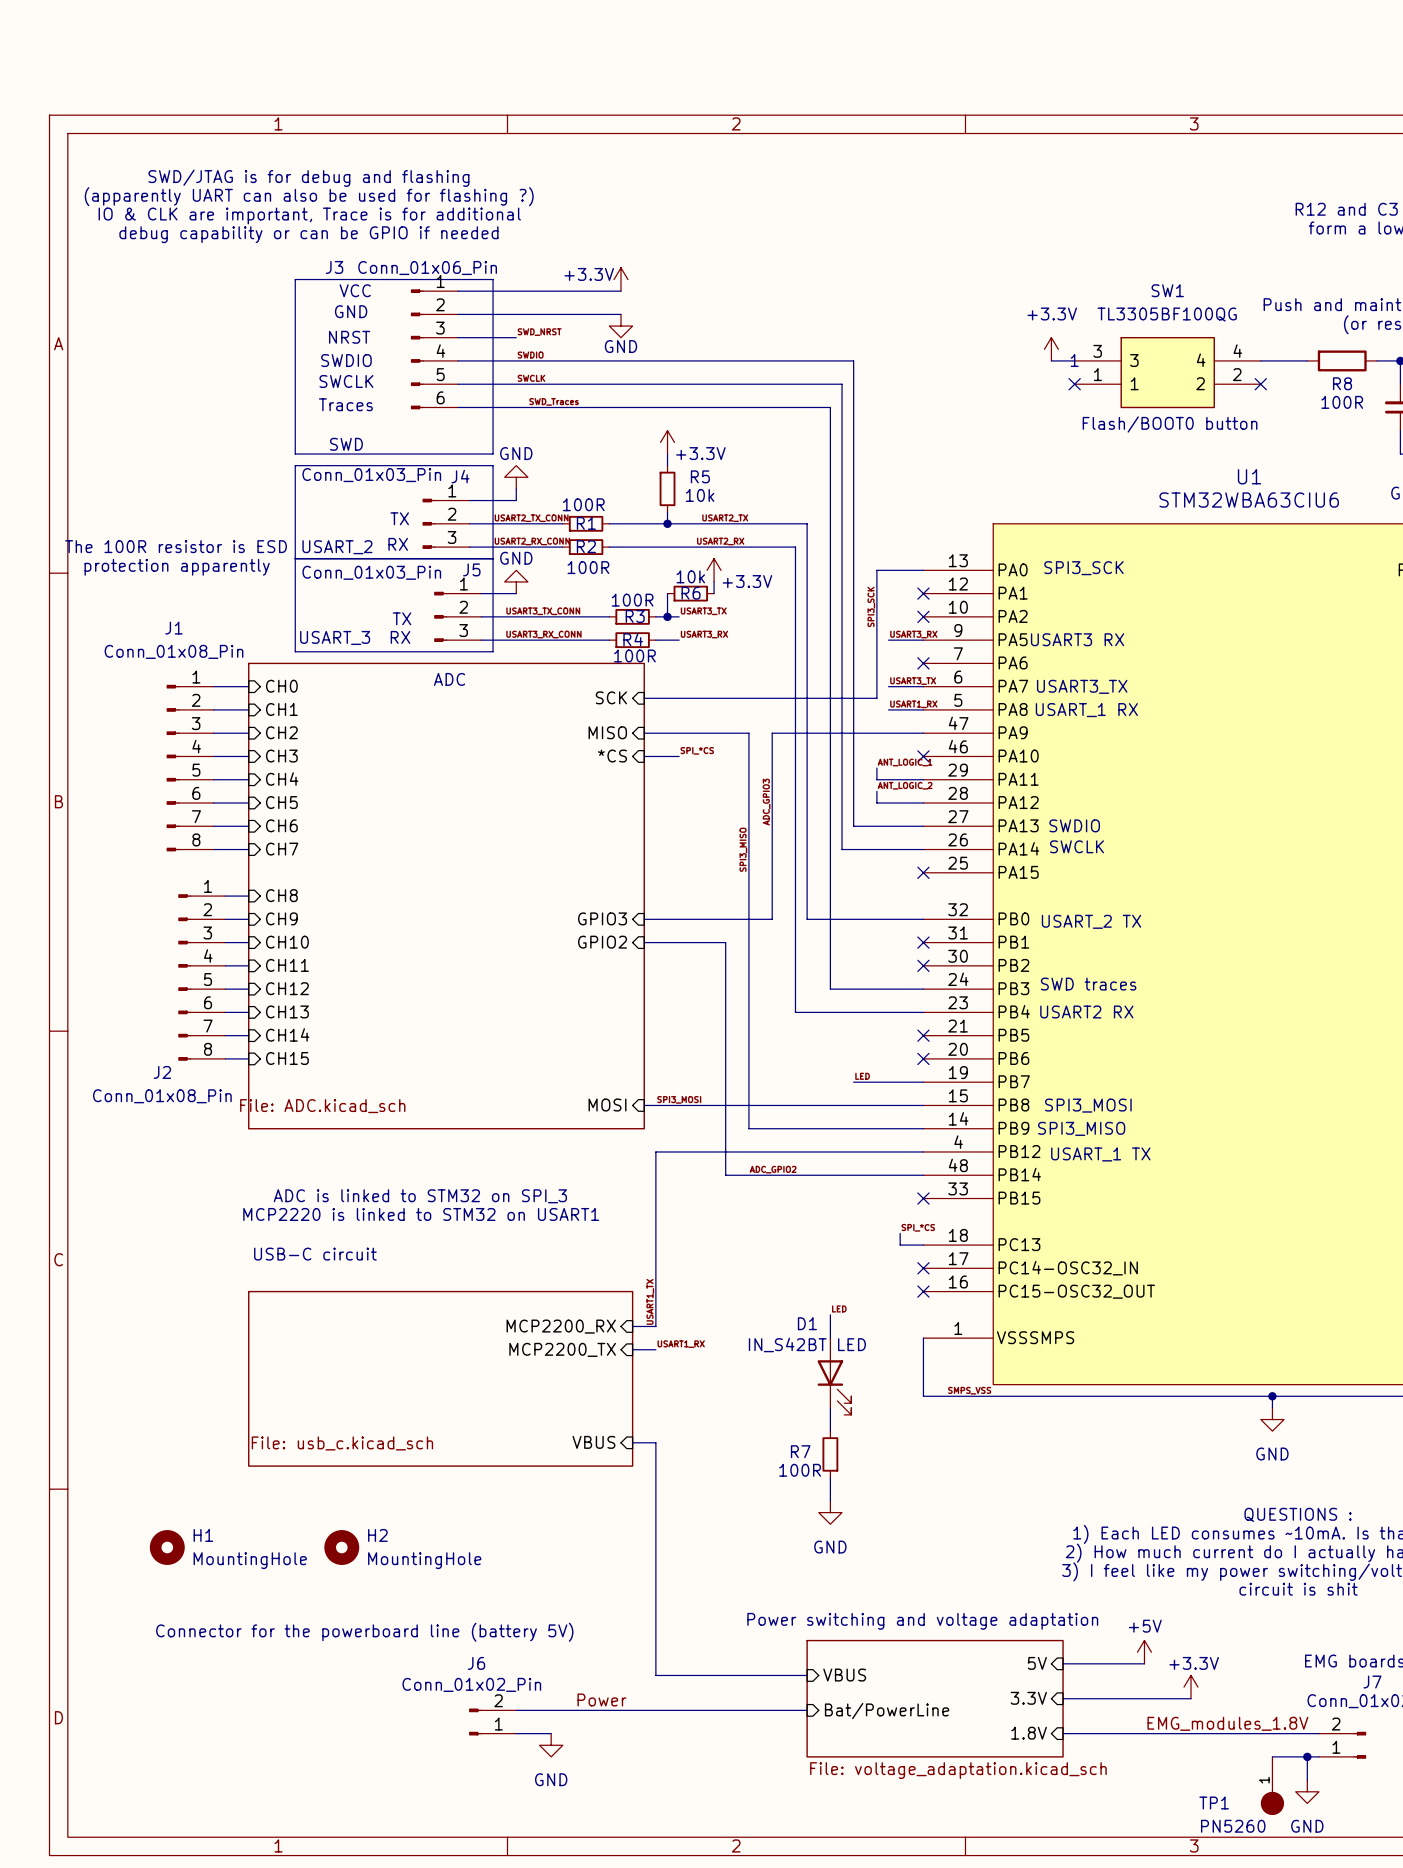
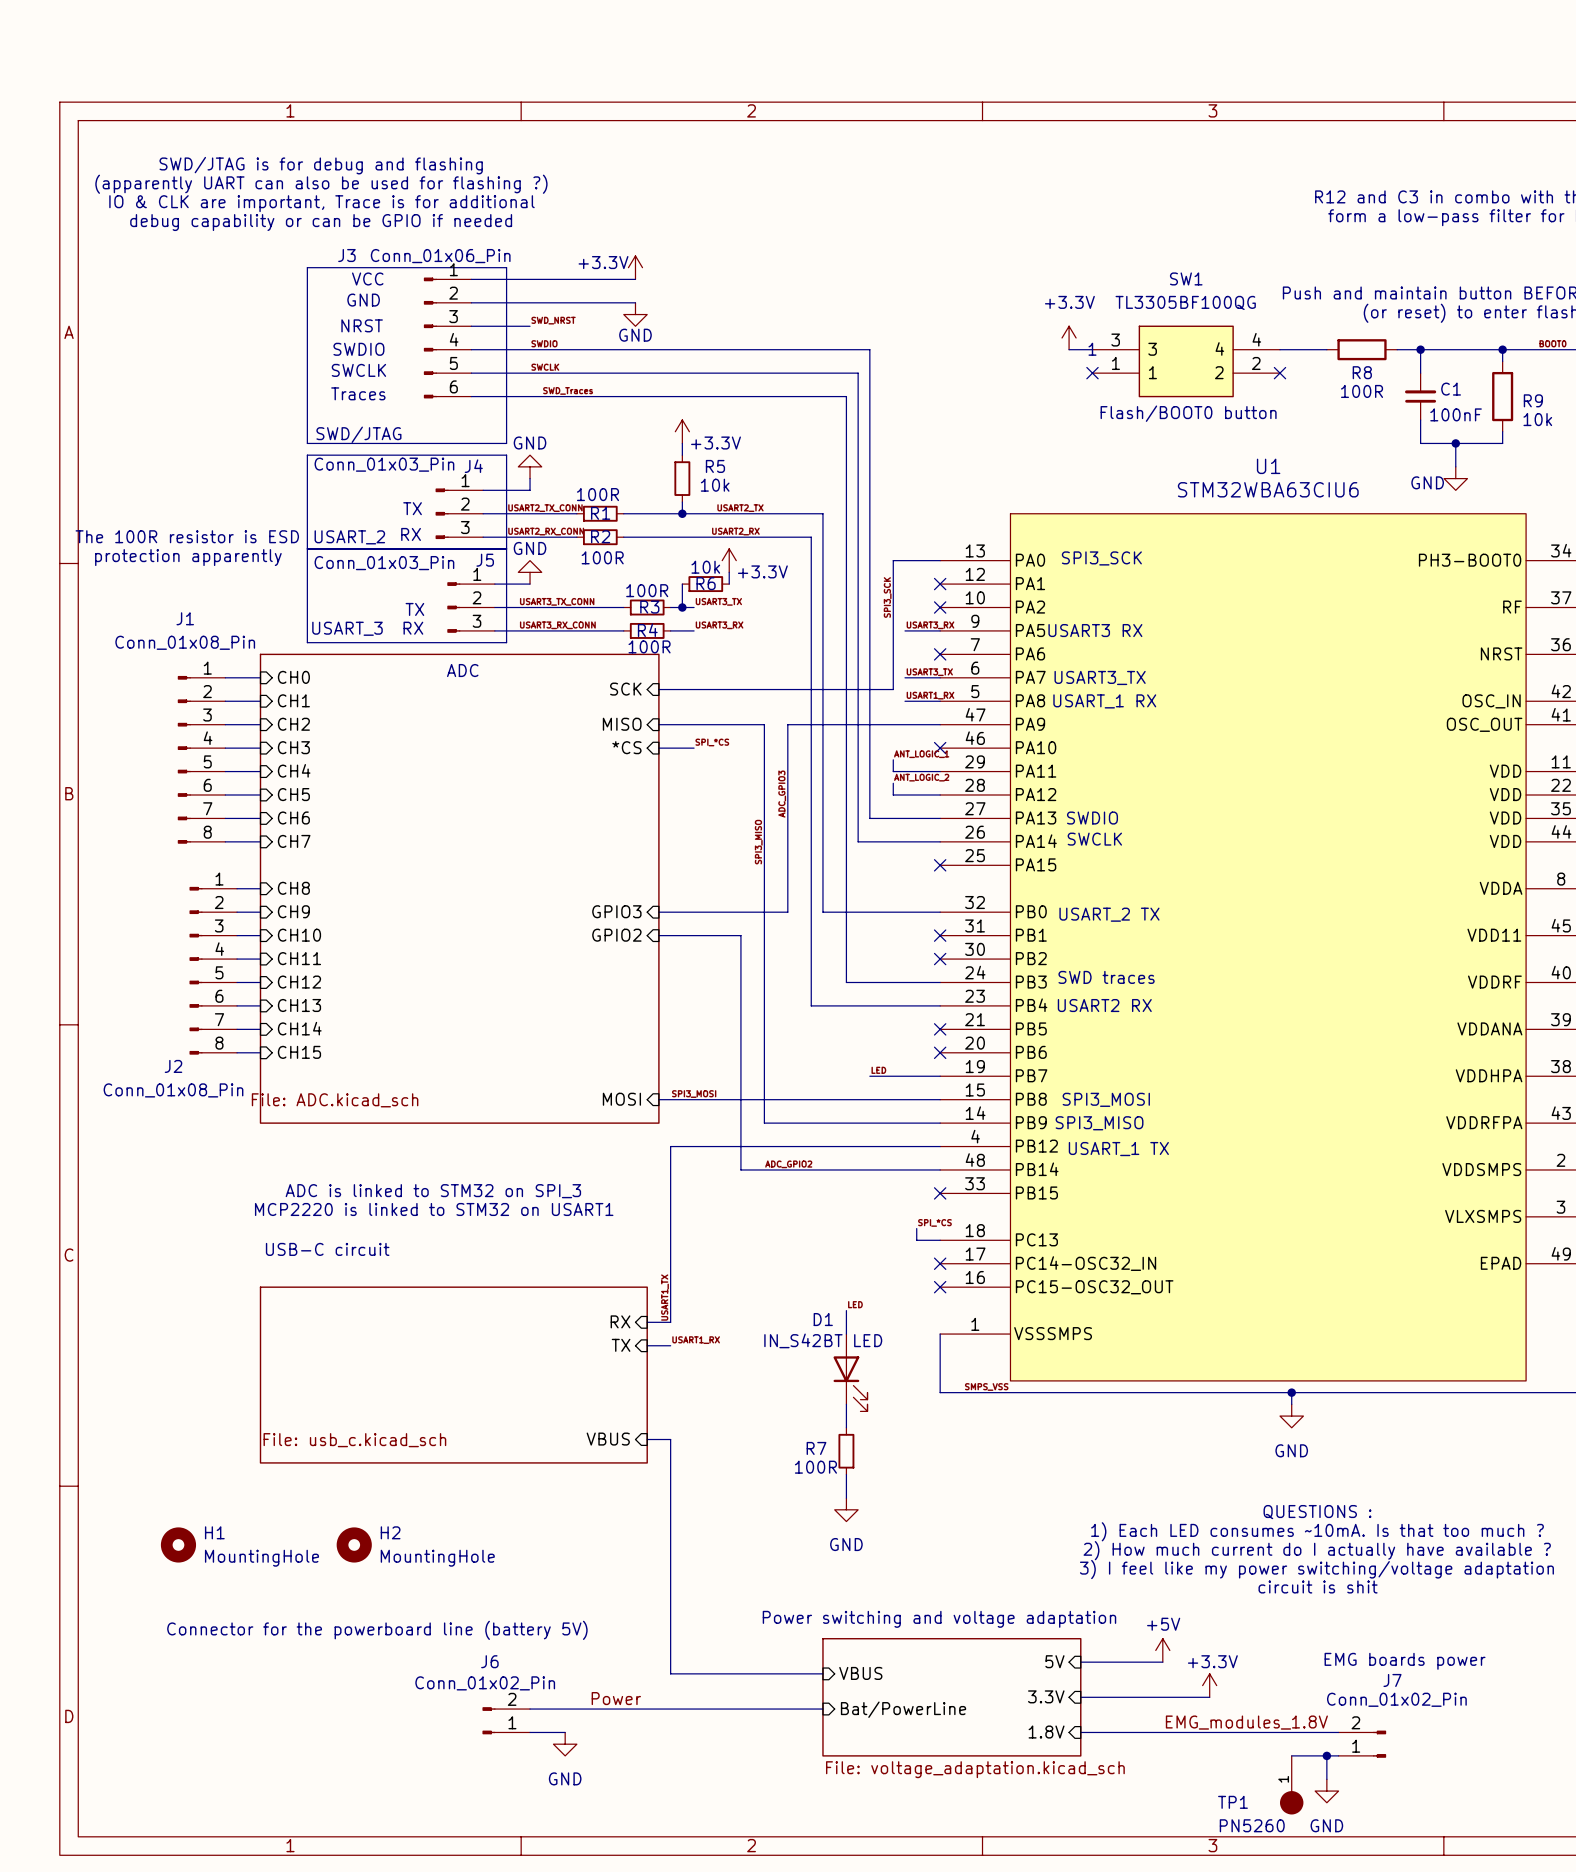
text: SWD (346, 444) -> SWD/JTAG (358, 434)
sheet pin: MCP2200_RX (561, 1326) -> RX (620, 1321)
sheet pin: MCP2200_TX (562, 1349) -> TX (621, 1345)

